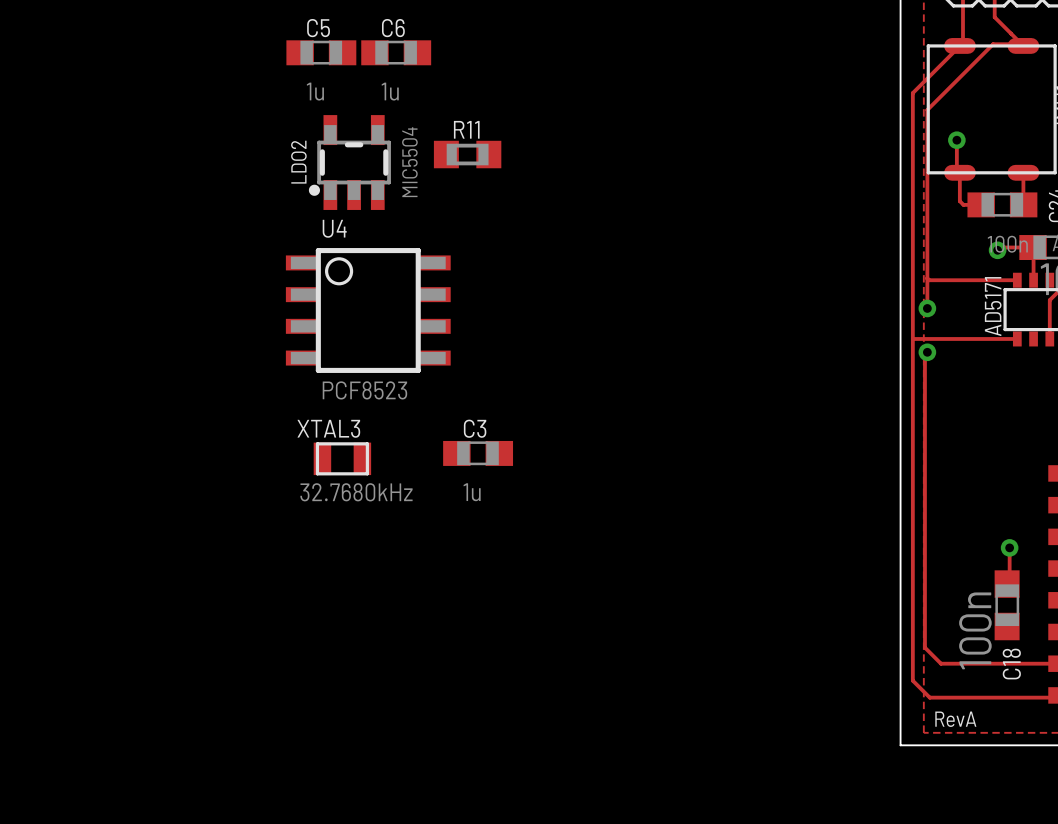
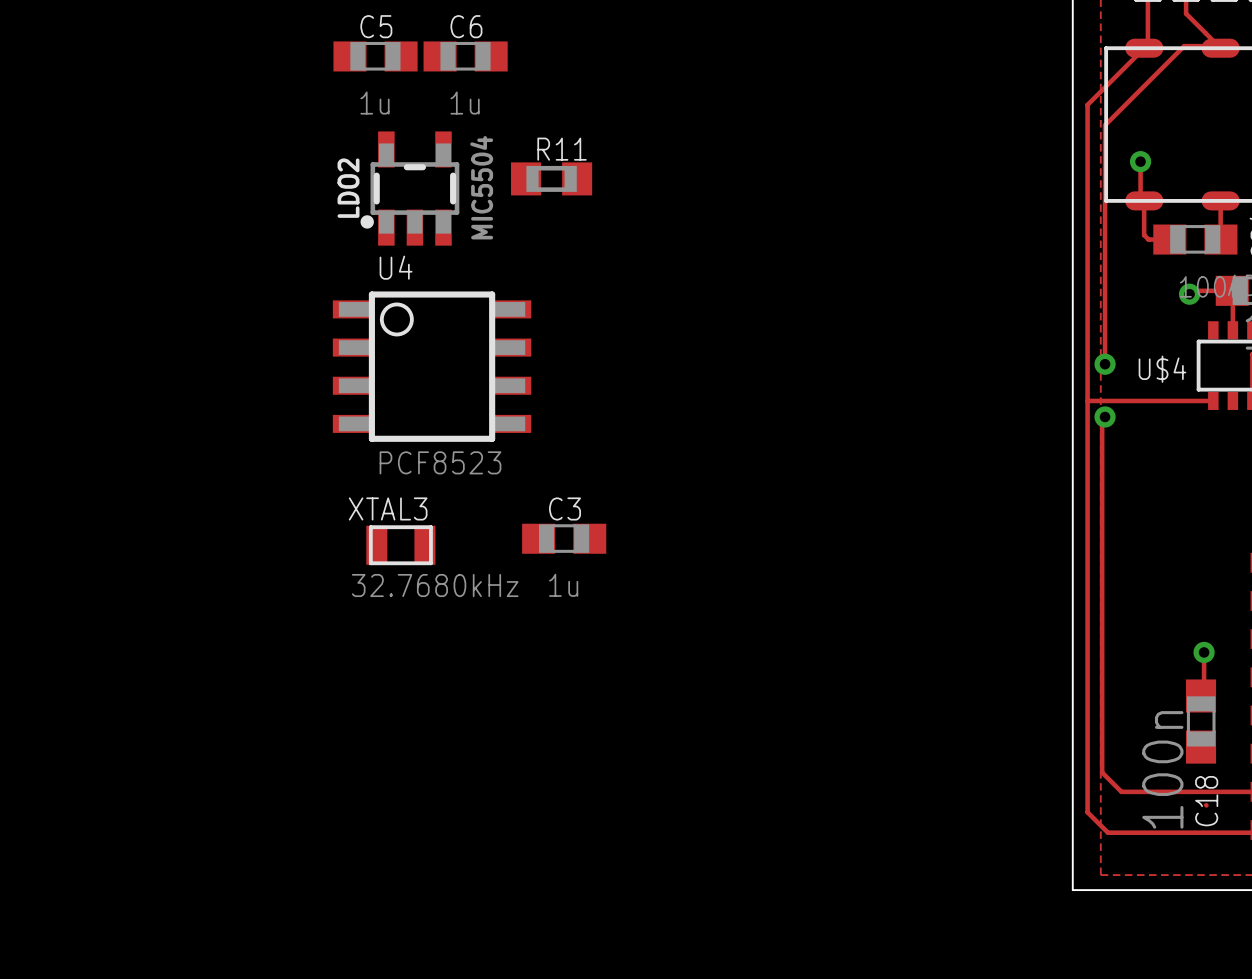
track: (927, 278) (929, 280) (1017, 280) -> none
AD5171 name: AD5171 (993, 306) -> U$4 (1162, 369)
drawing: [935, 711, 977, 727] -> none

